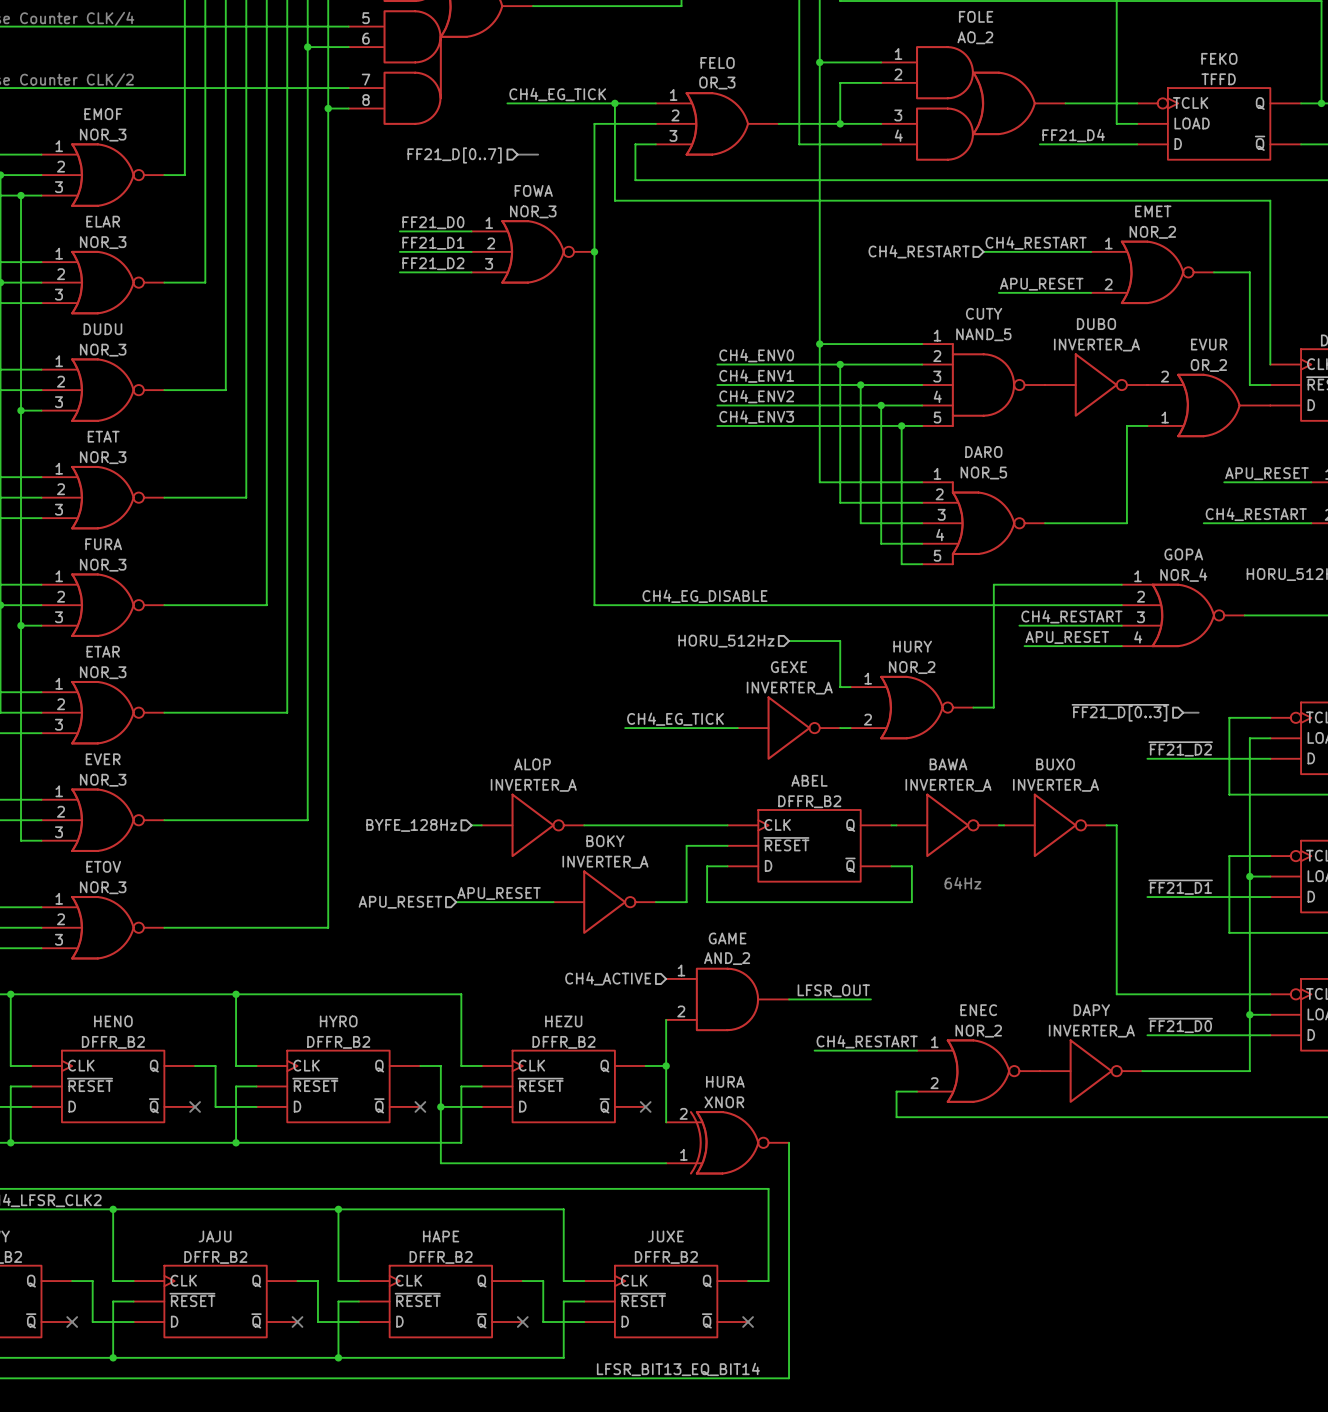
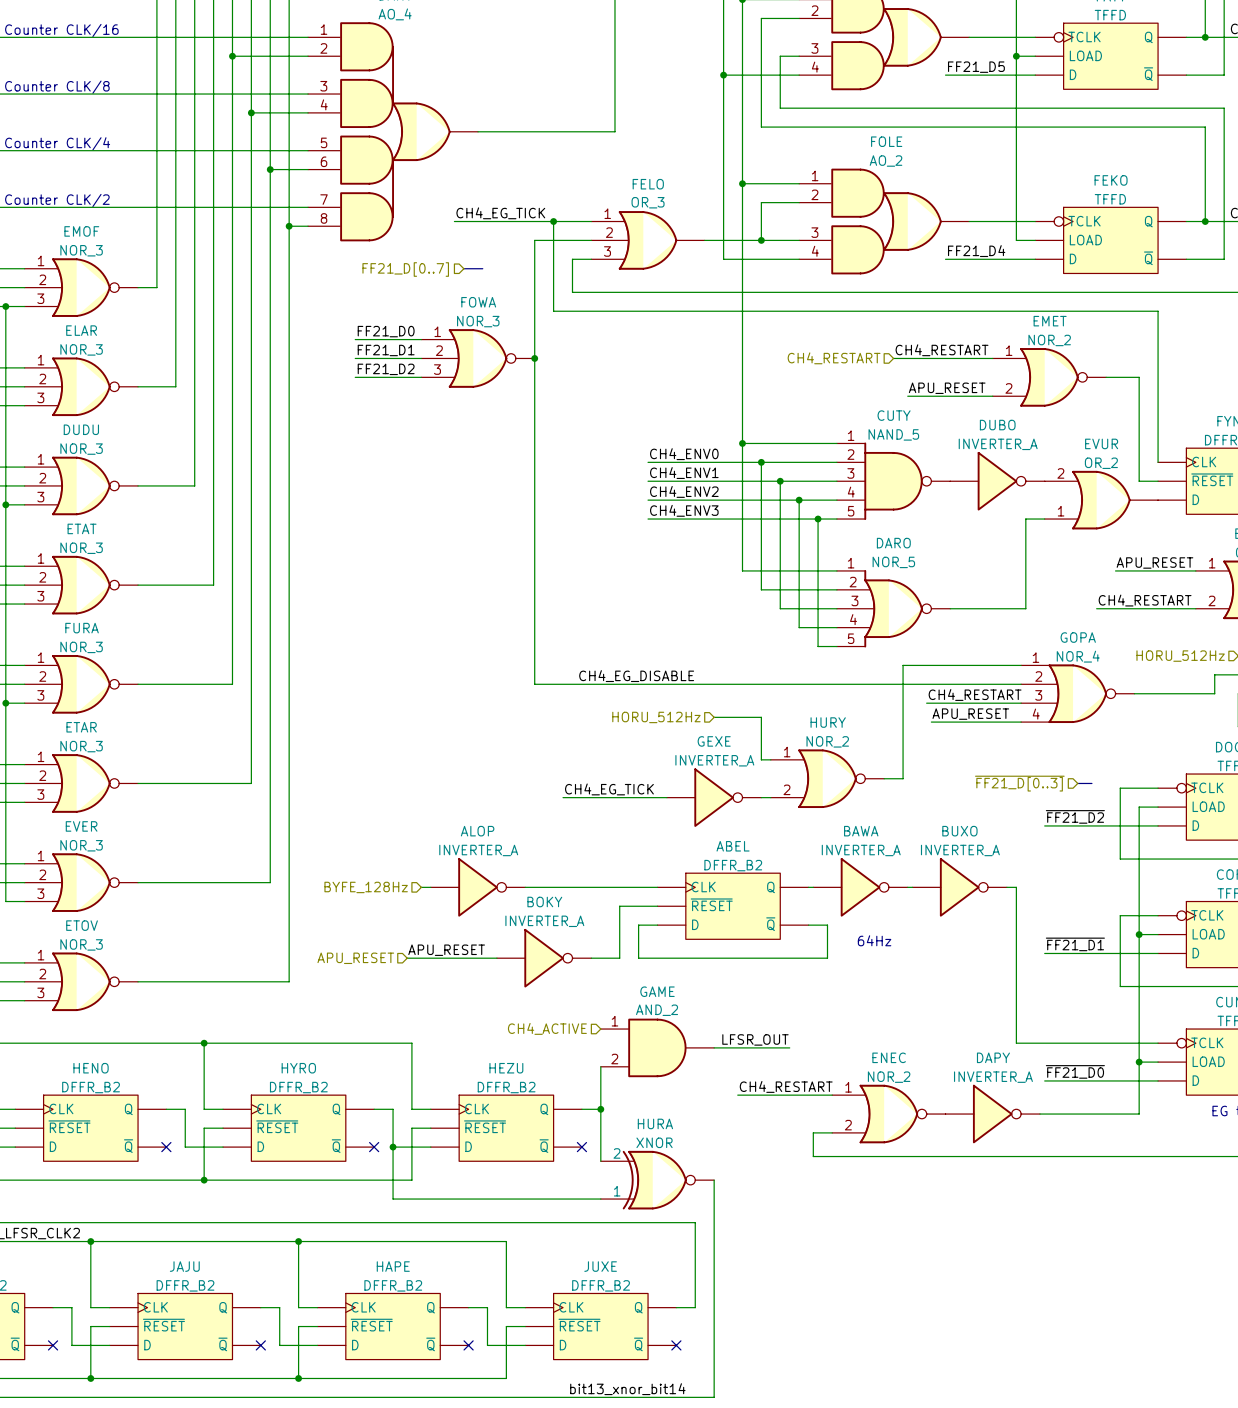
label: LFSR_BIT13_EQ_BIT14 (678, 1369) -> none
label: none -> bit13_xnor_bit14 (627, 1389)

